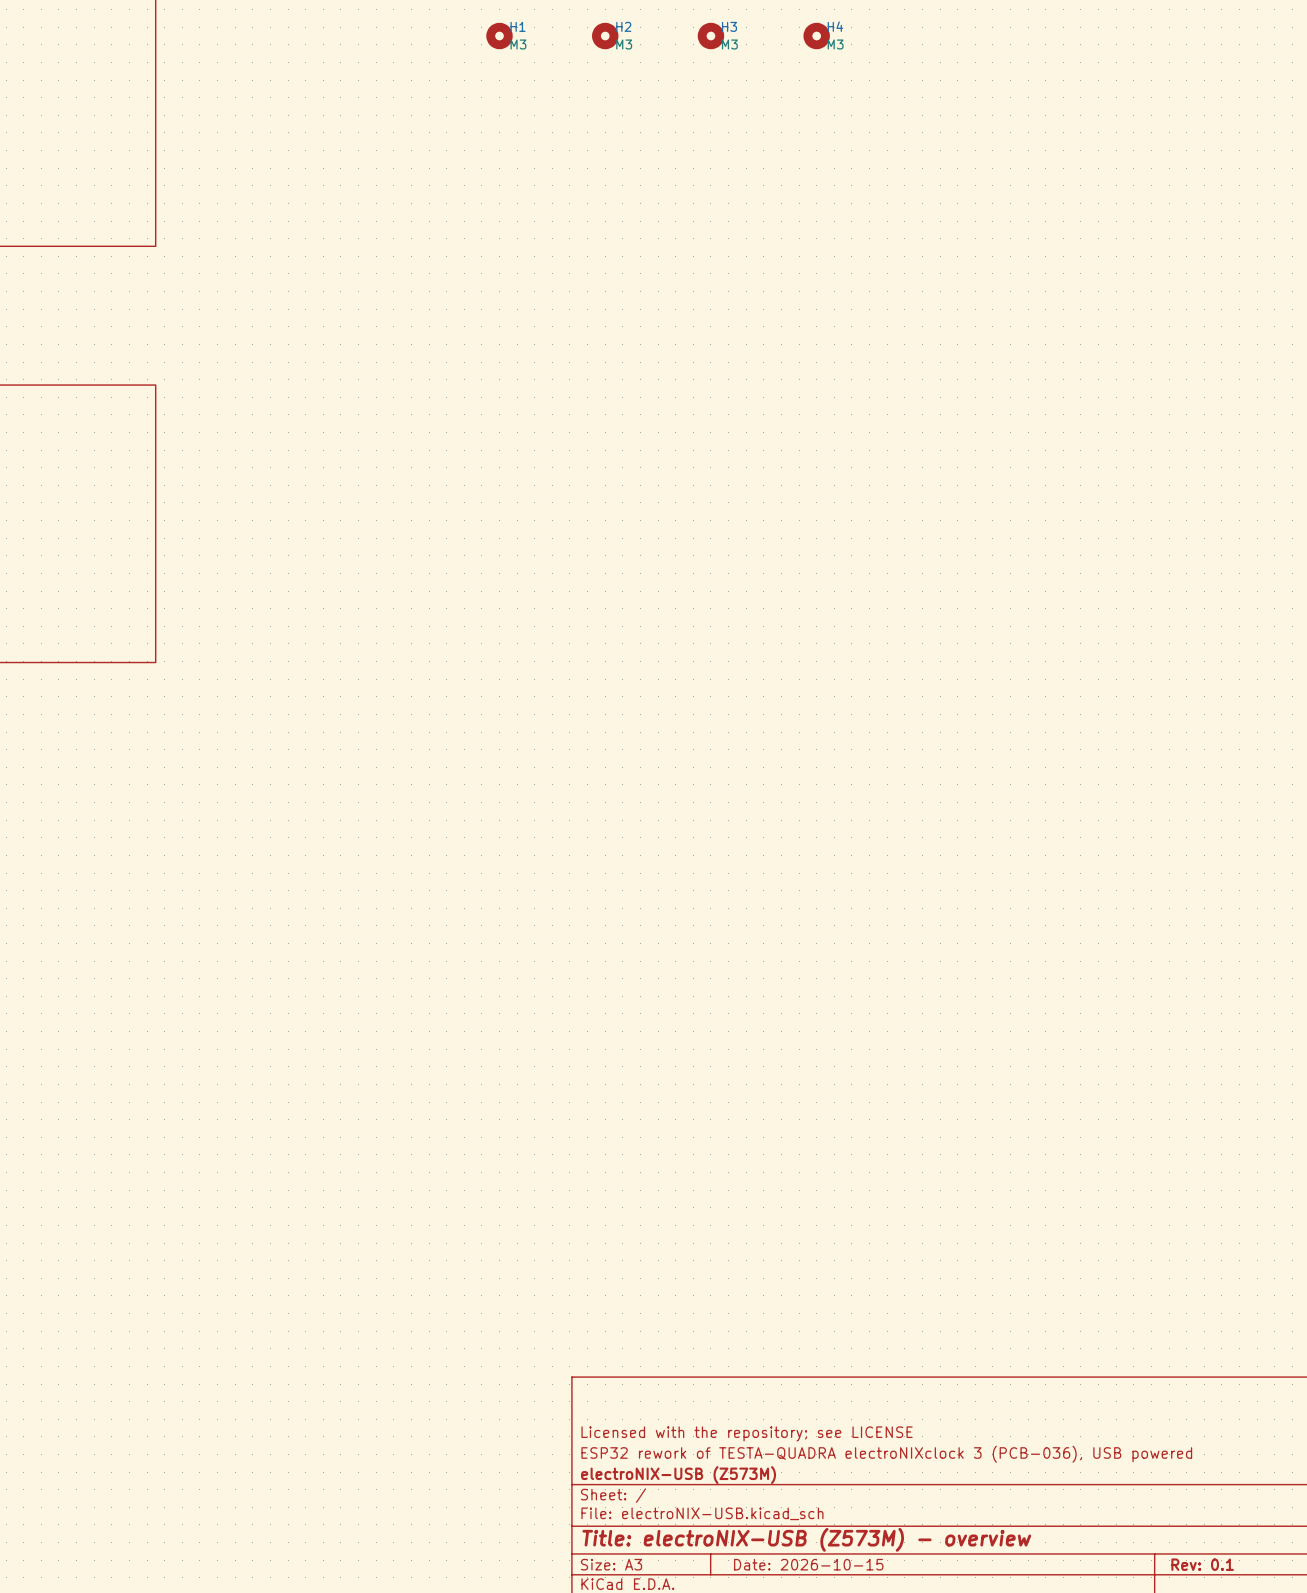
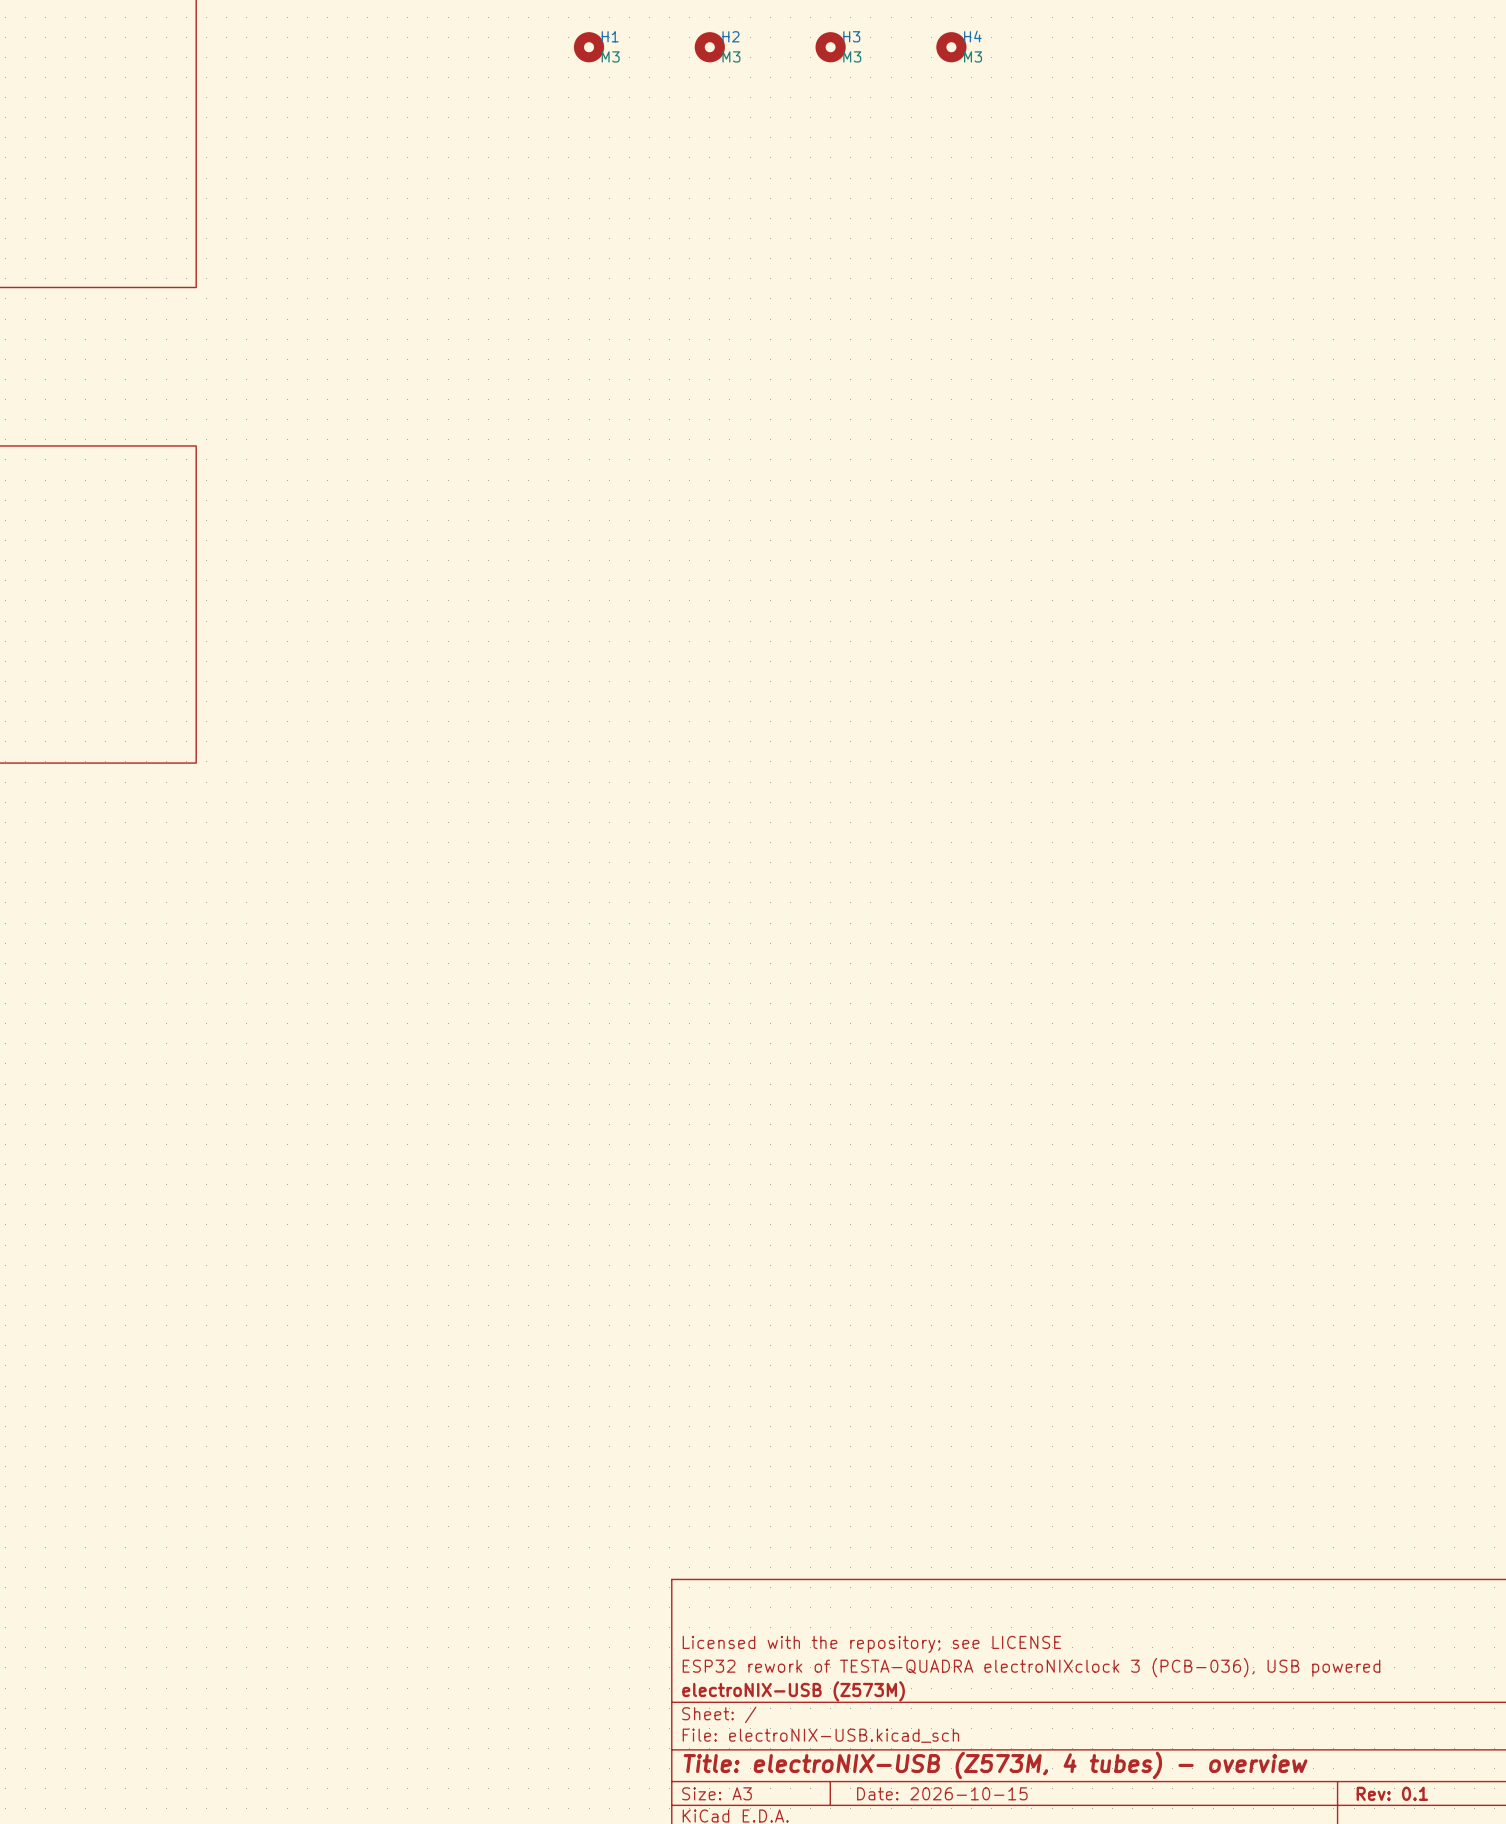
title block: Title: electroNIX-USB (Z573M) - overview (806, 1539) -> Title: electroNIX-USB (Z573M, 4 tubes) - overview (995, 1765)

